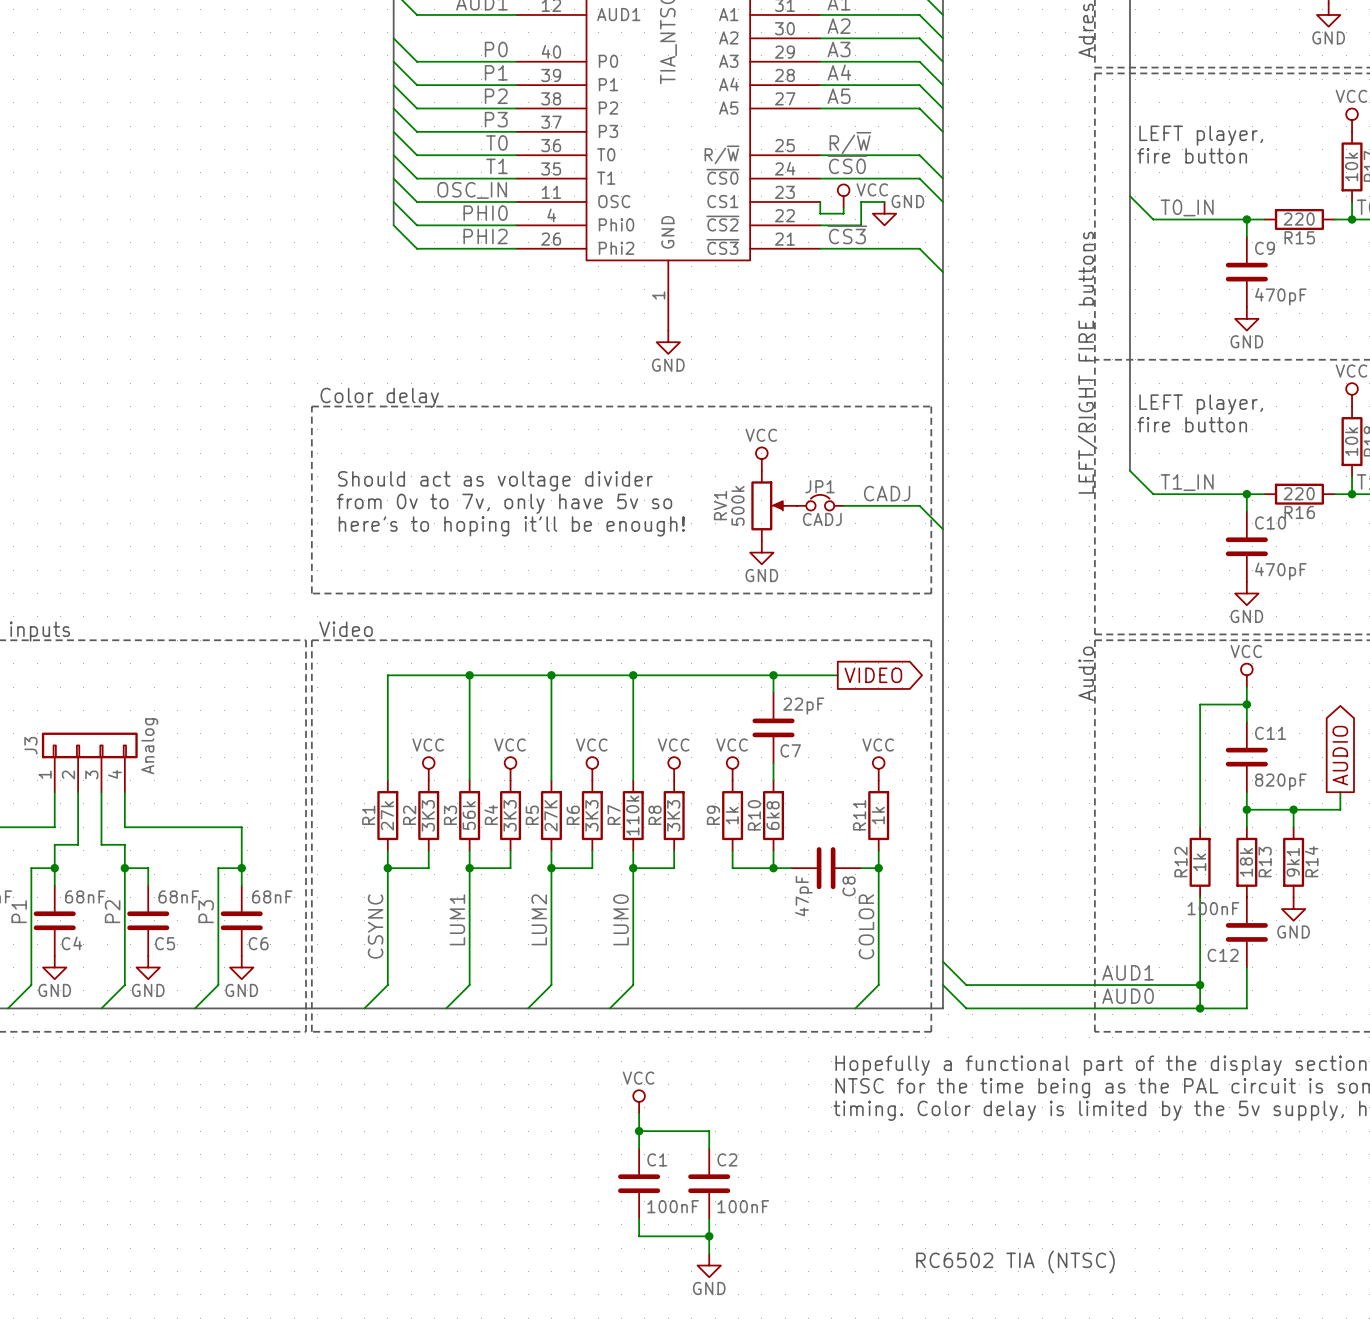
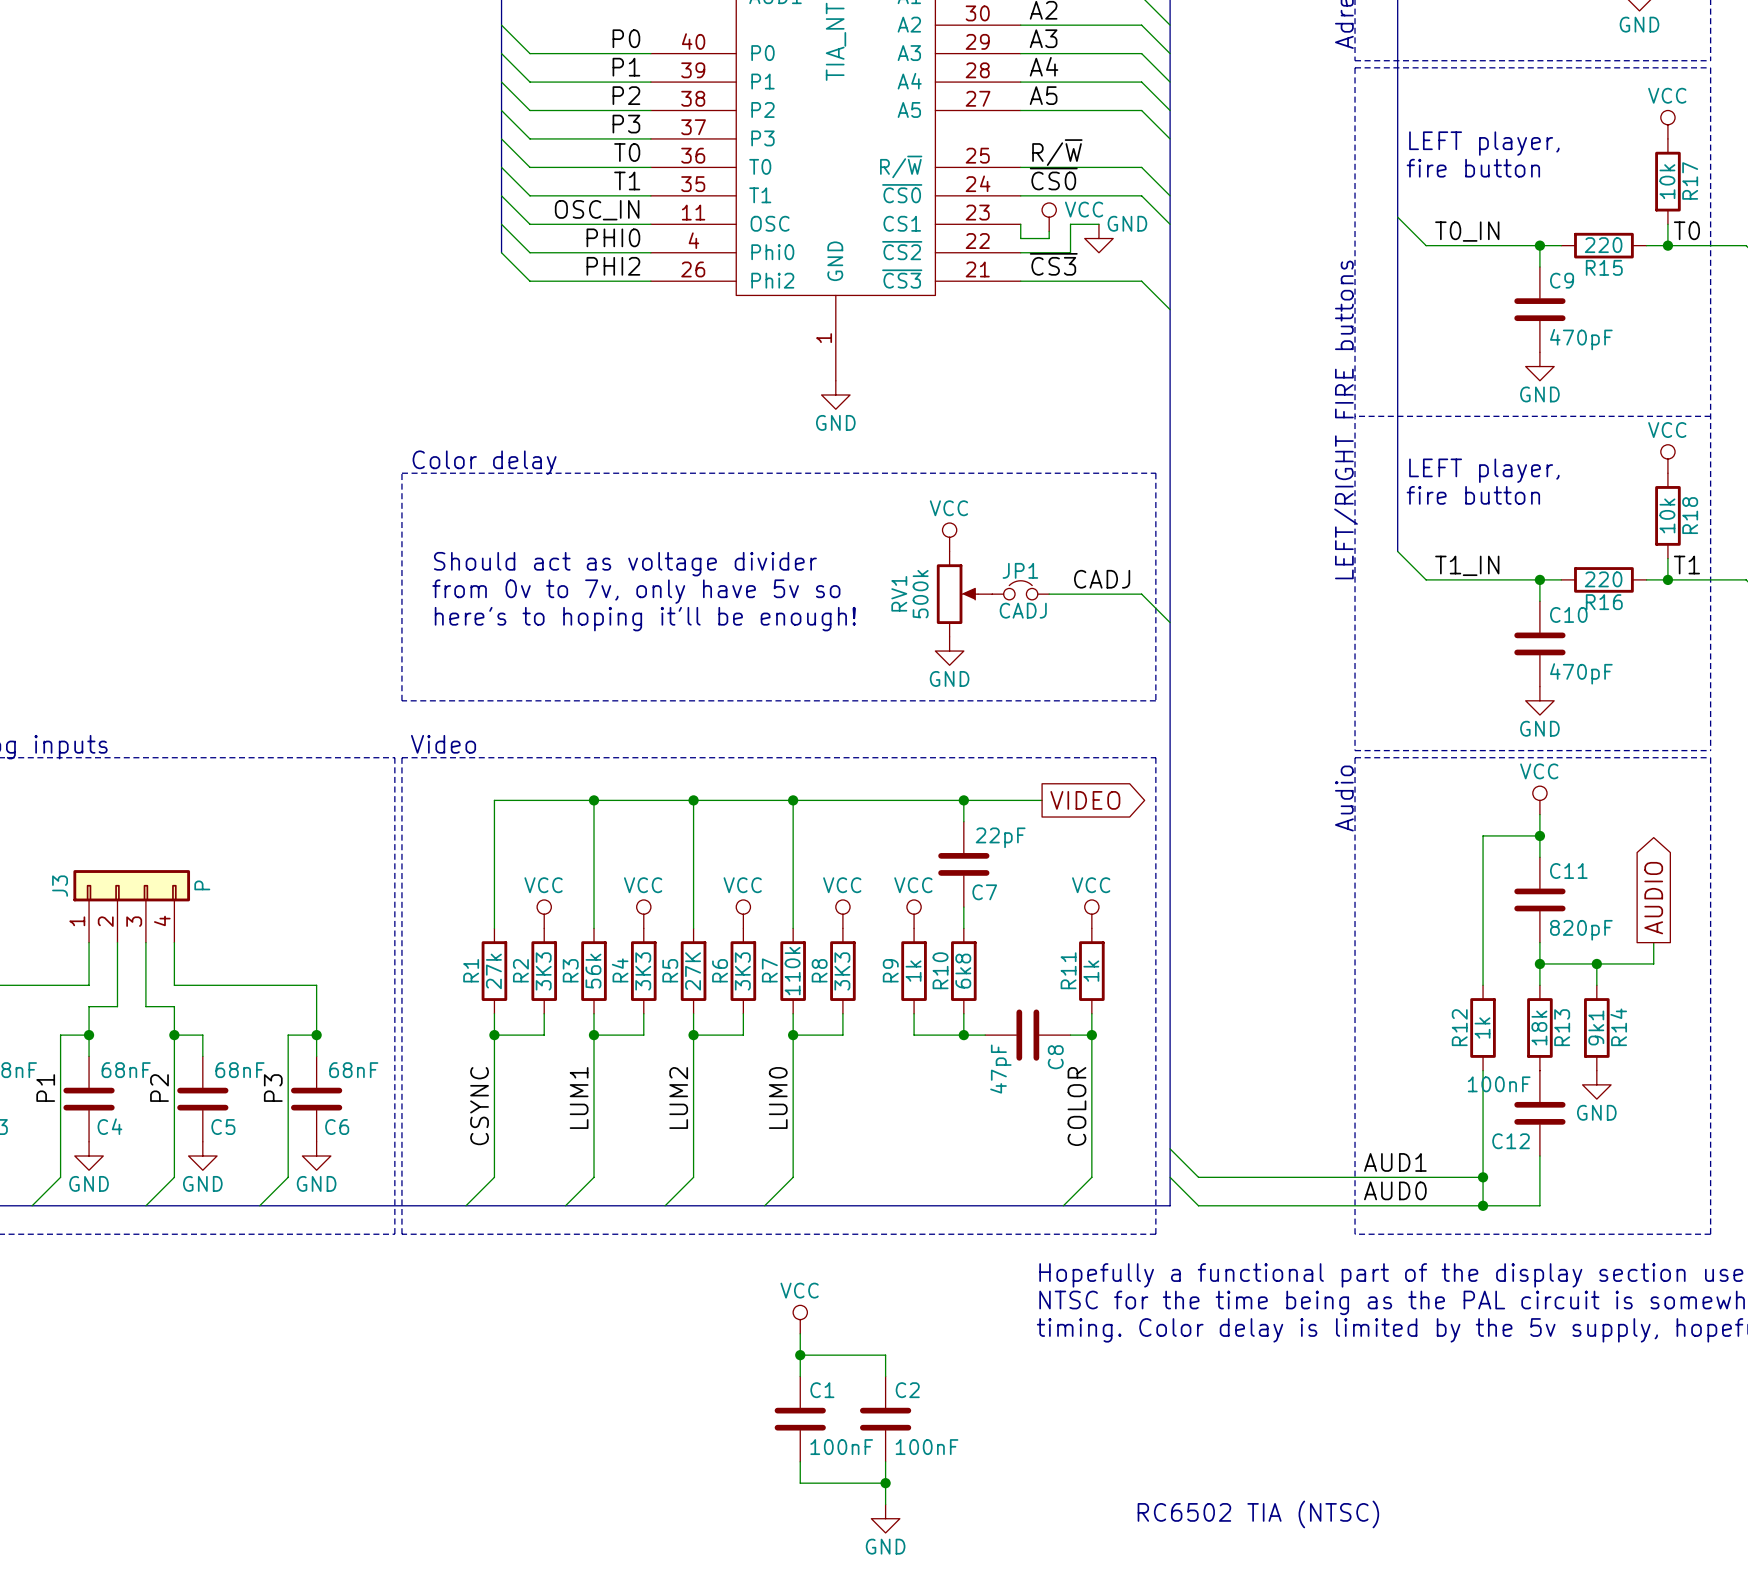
J3 value: Analog (149, 746) -> P (202, 885)

